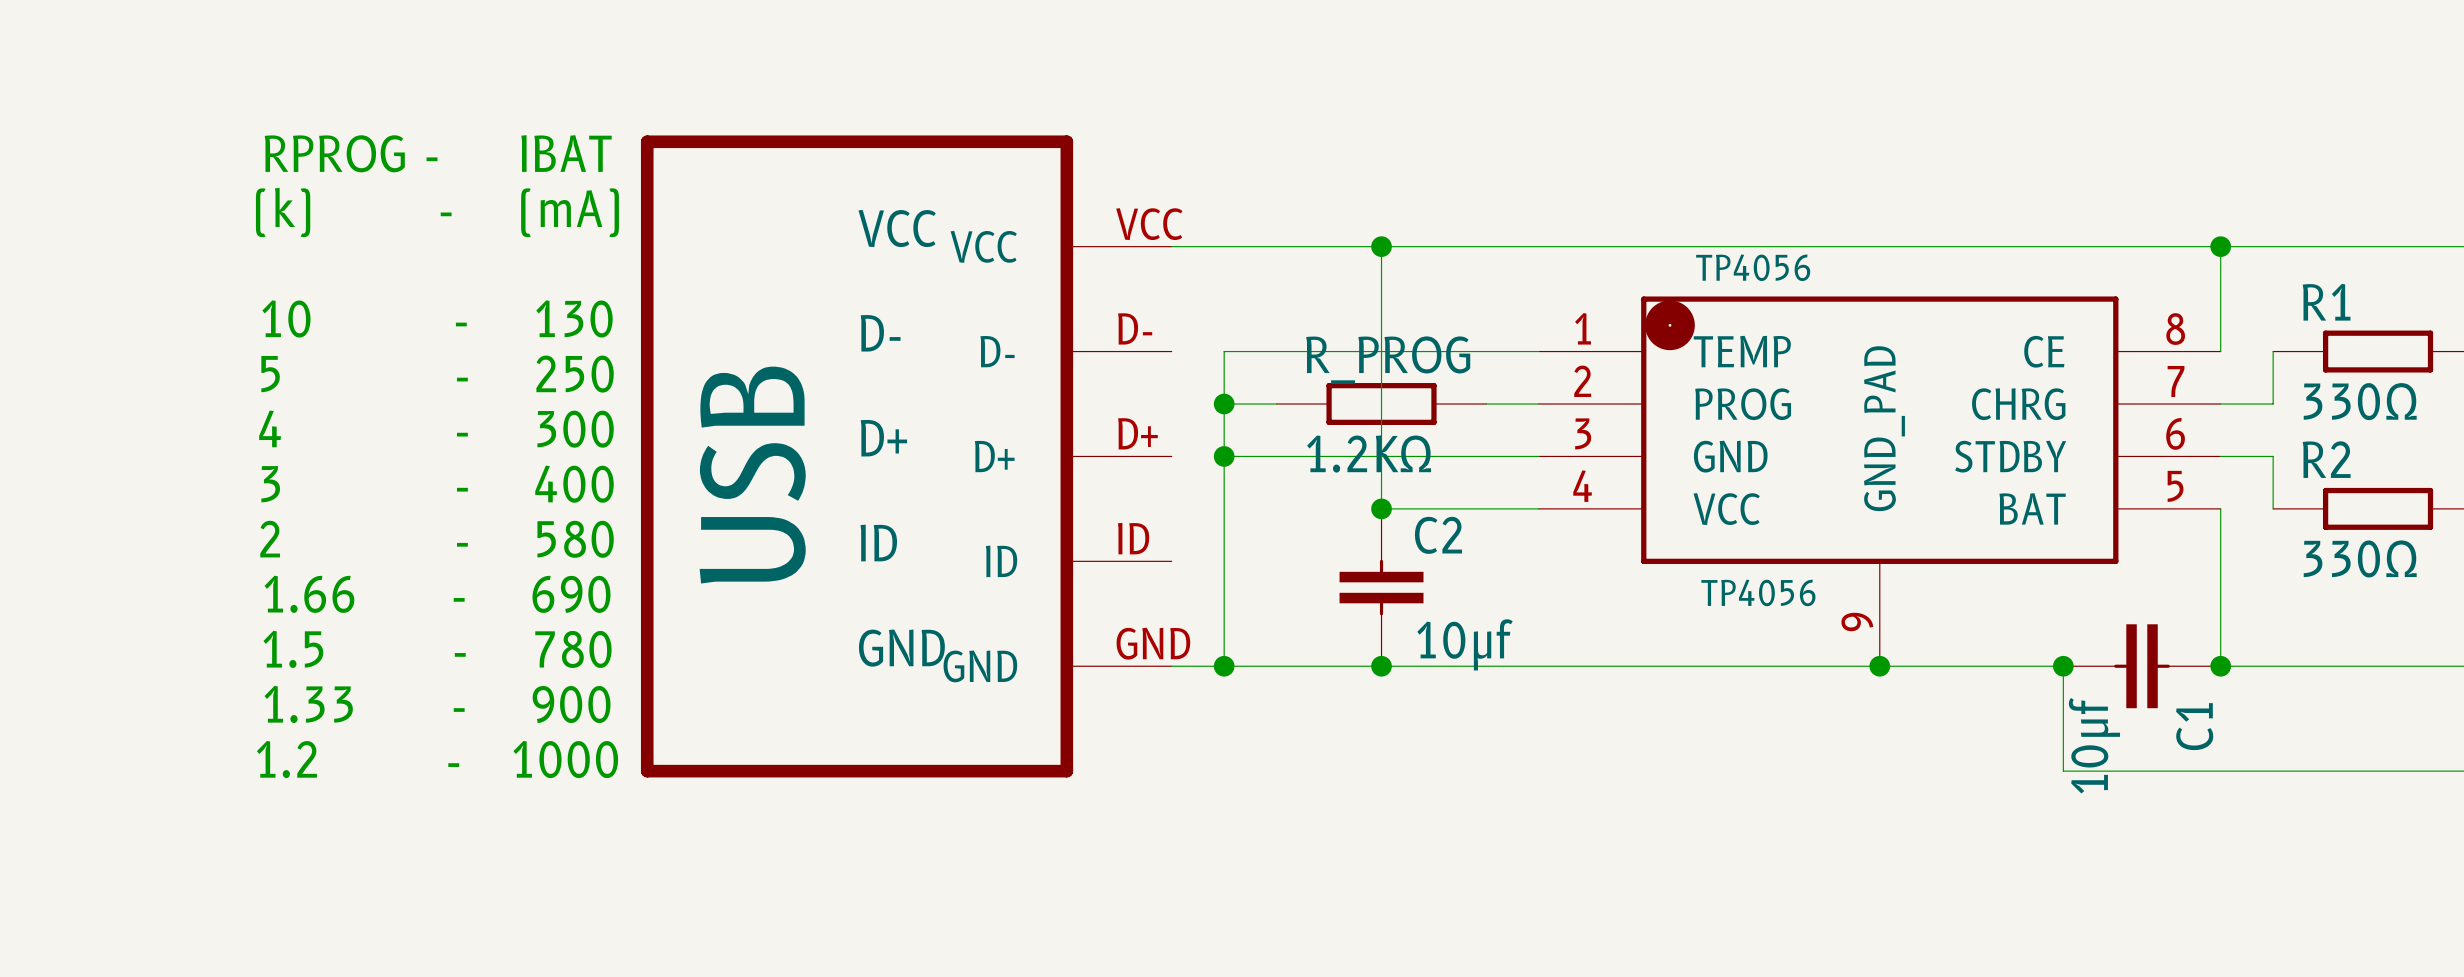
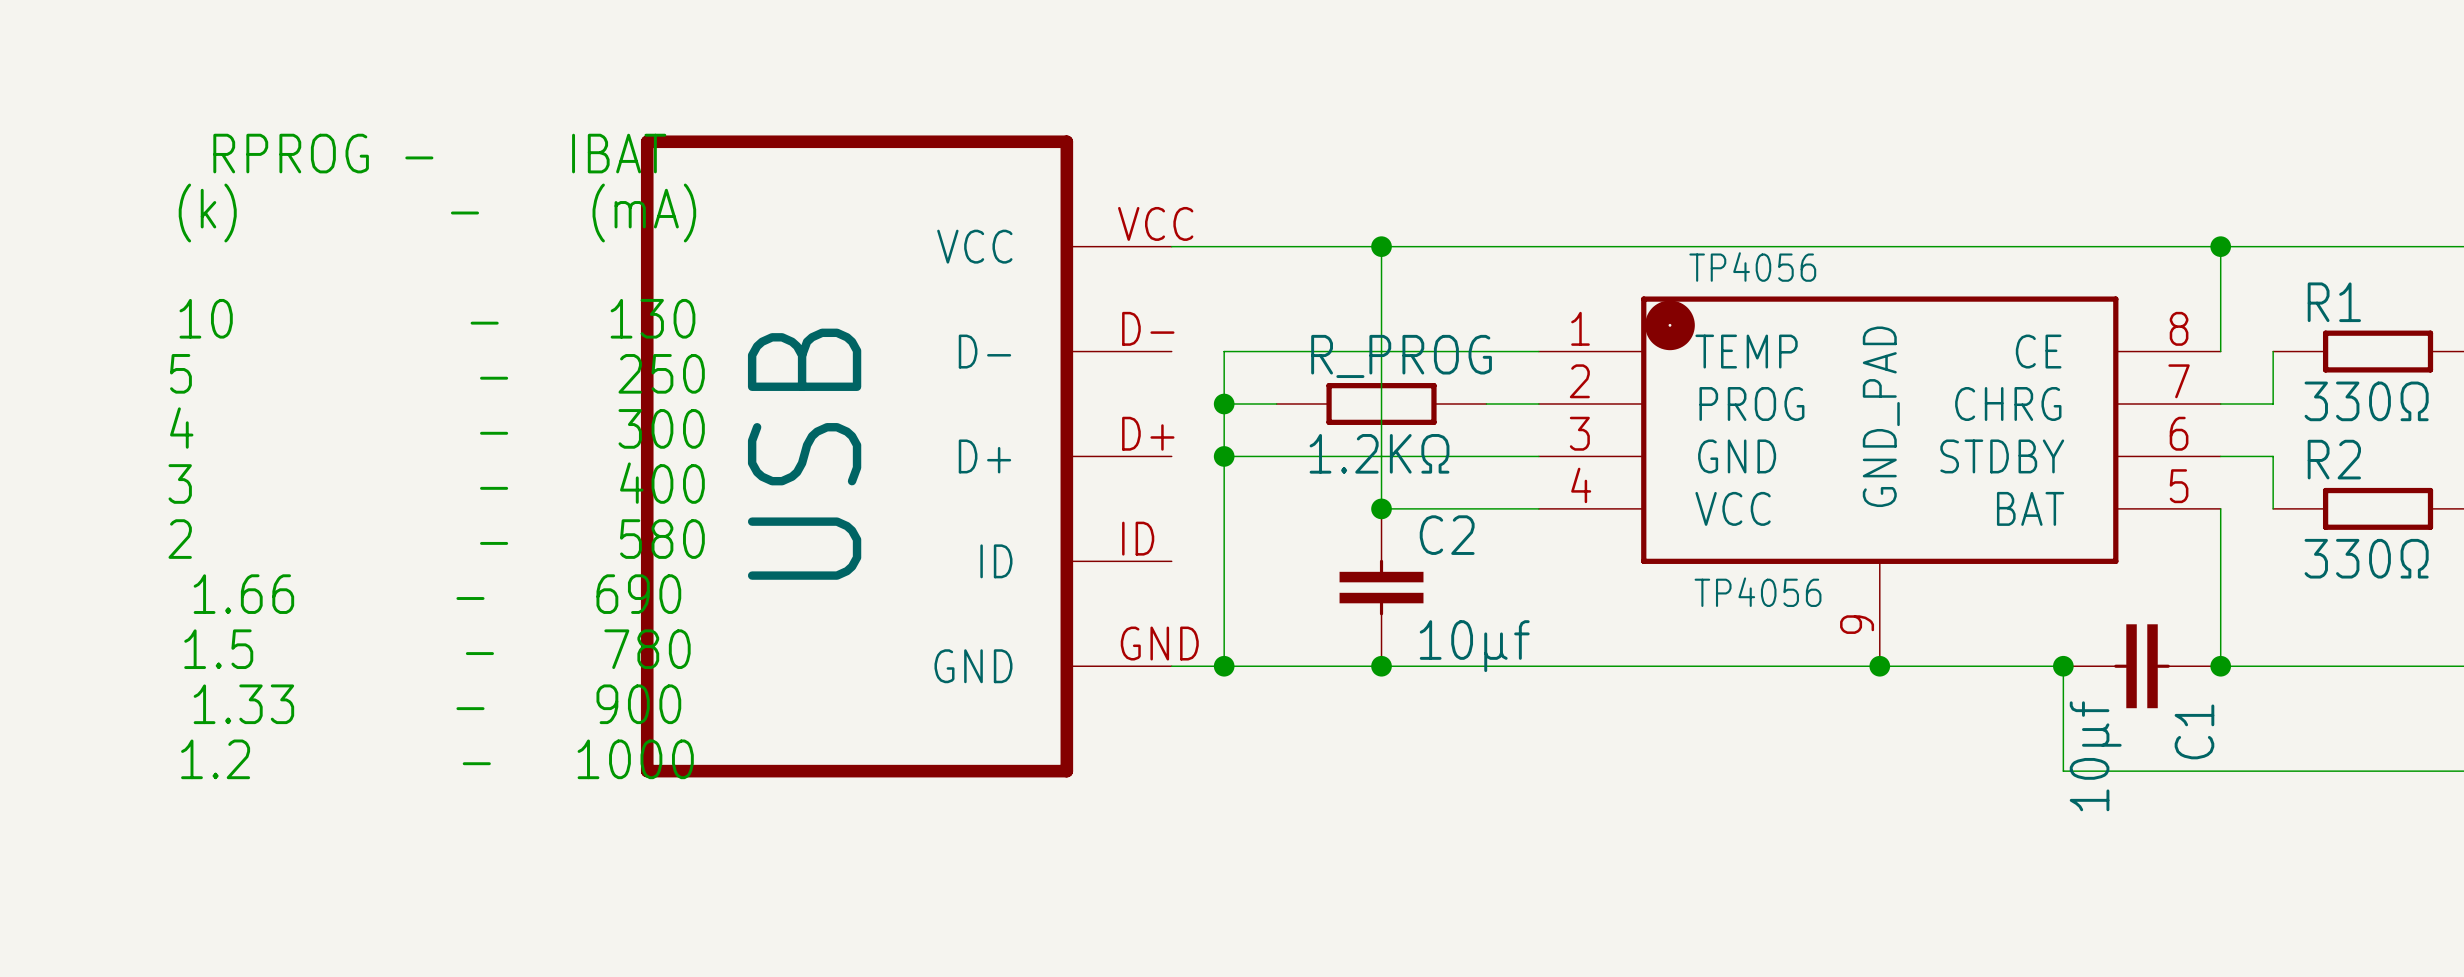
part text: VCC (897, 228) -> none
part text: D- (880, 333) -> none
part text: D+ (883, 438) -> none
part text position: USB (752, 475) -> USB (804, 454)
part text: ID (878, 542) -> none
part text: GND (901, 648) -> none

